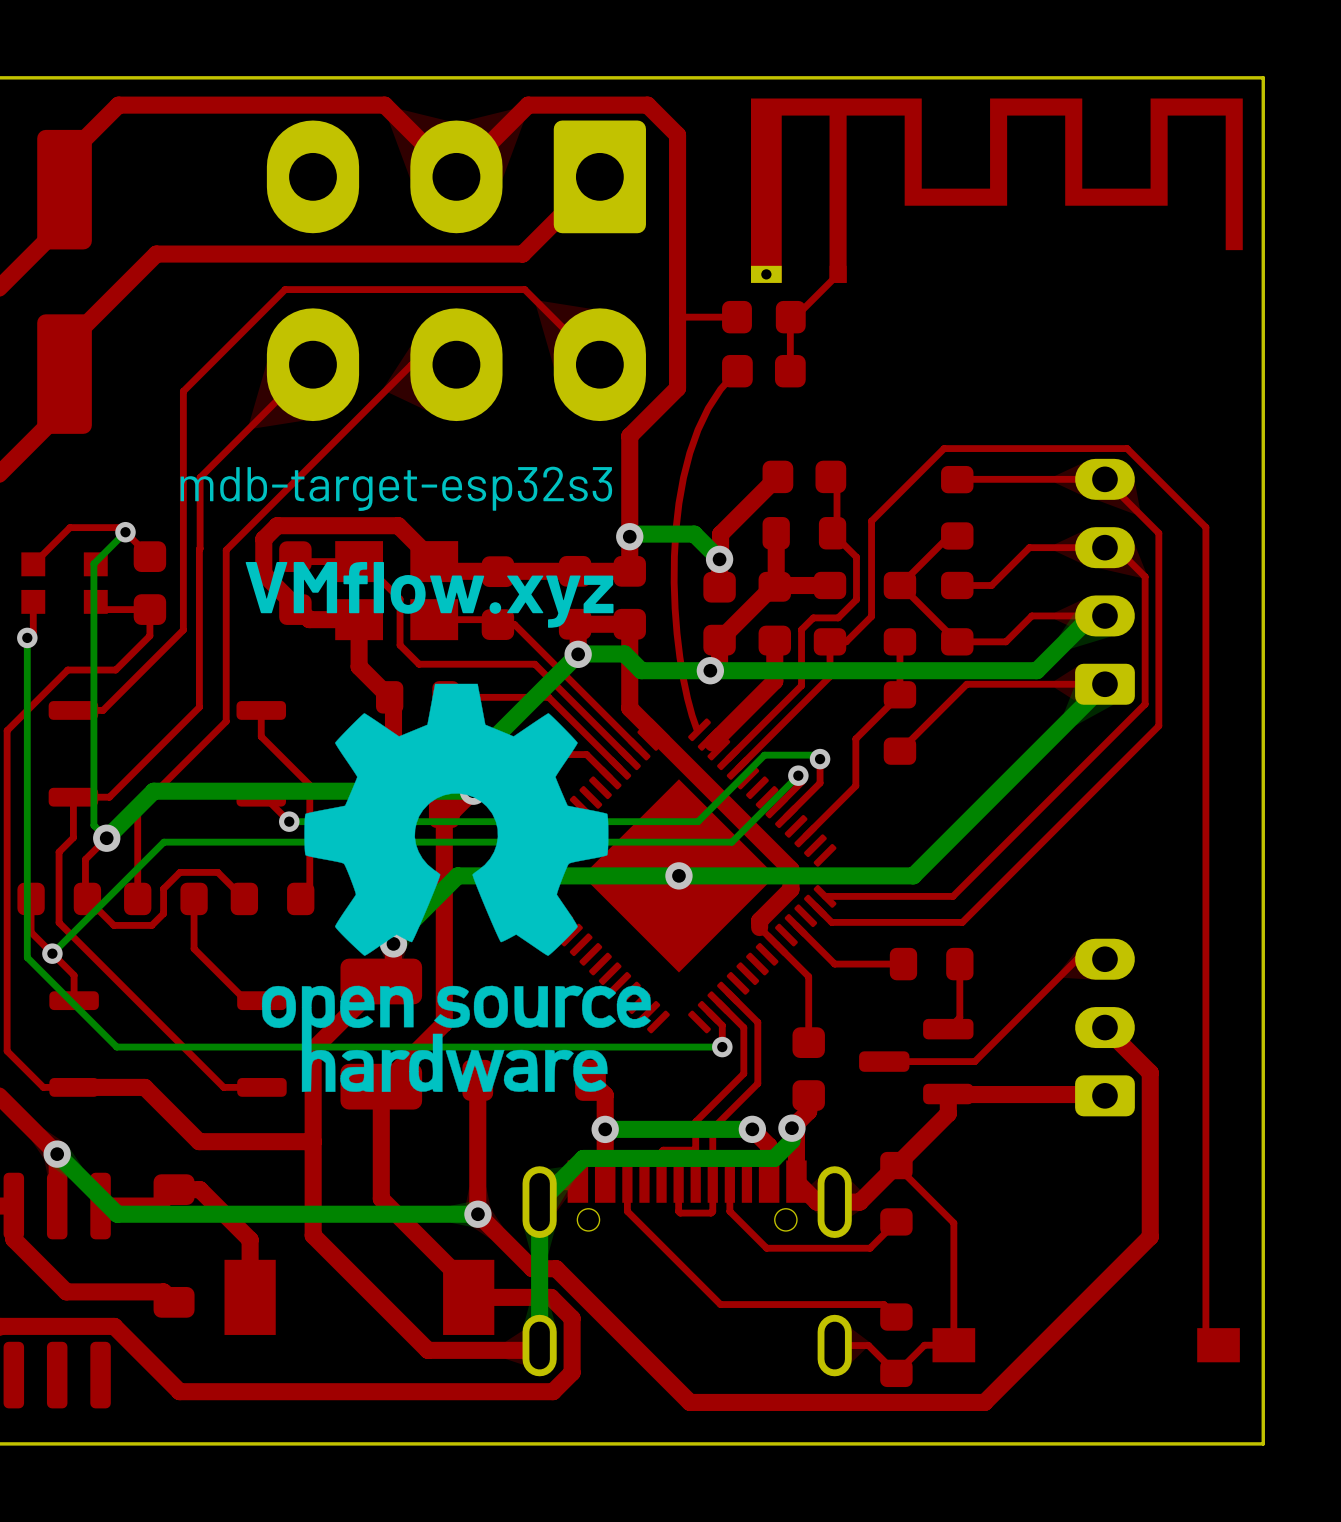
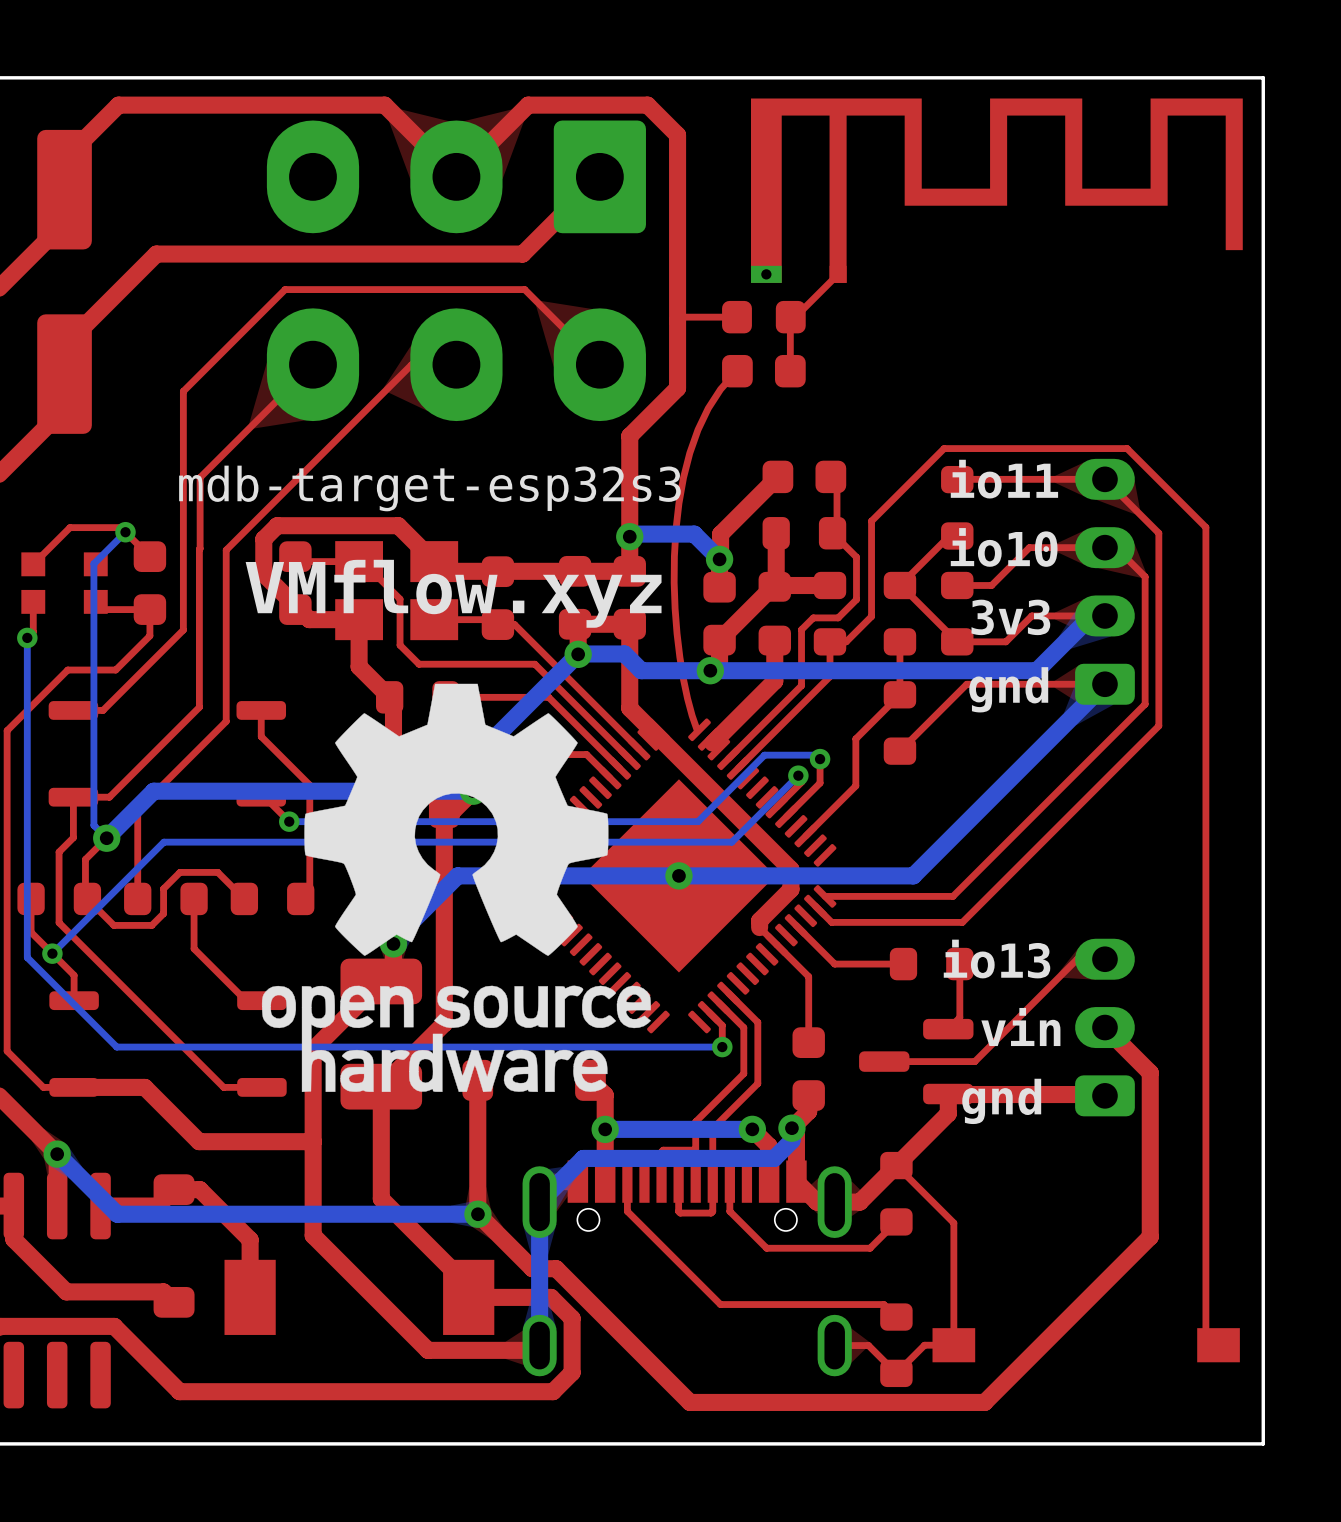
text: none -> io11 (1004, 479)
text: none -> io10 (1004, 547)
text: none -> 3v3 (1010, 617)
text: none -> gnd (1008, 689)
text: none -> io13 (997, 959)
text: none -> vin (1020, 1027)
text: none -> gnd (1001, 1101)

